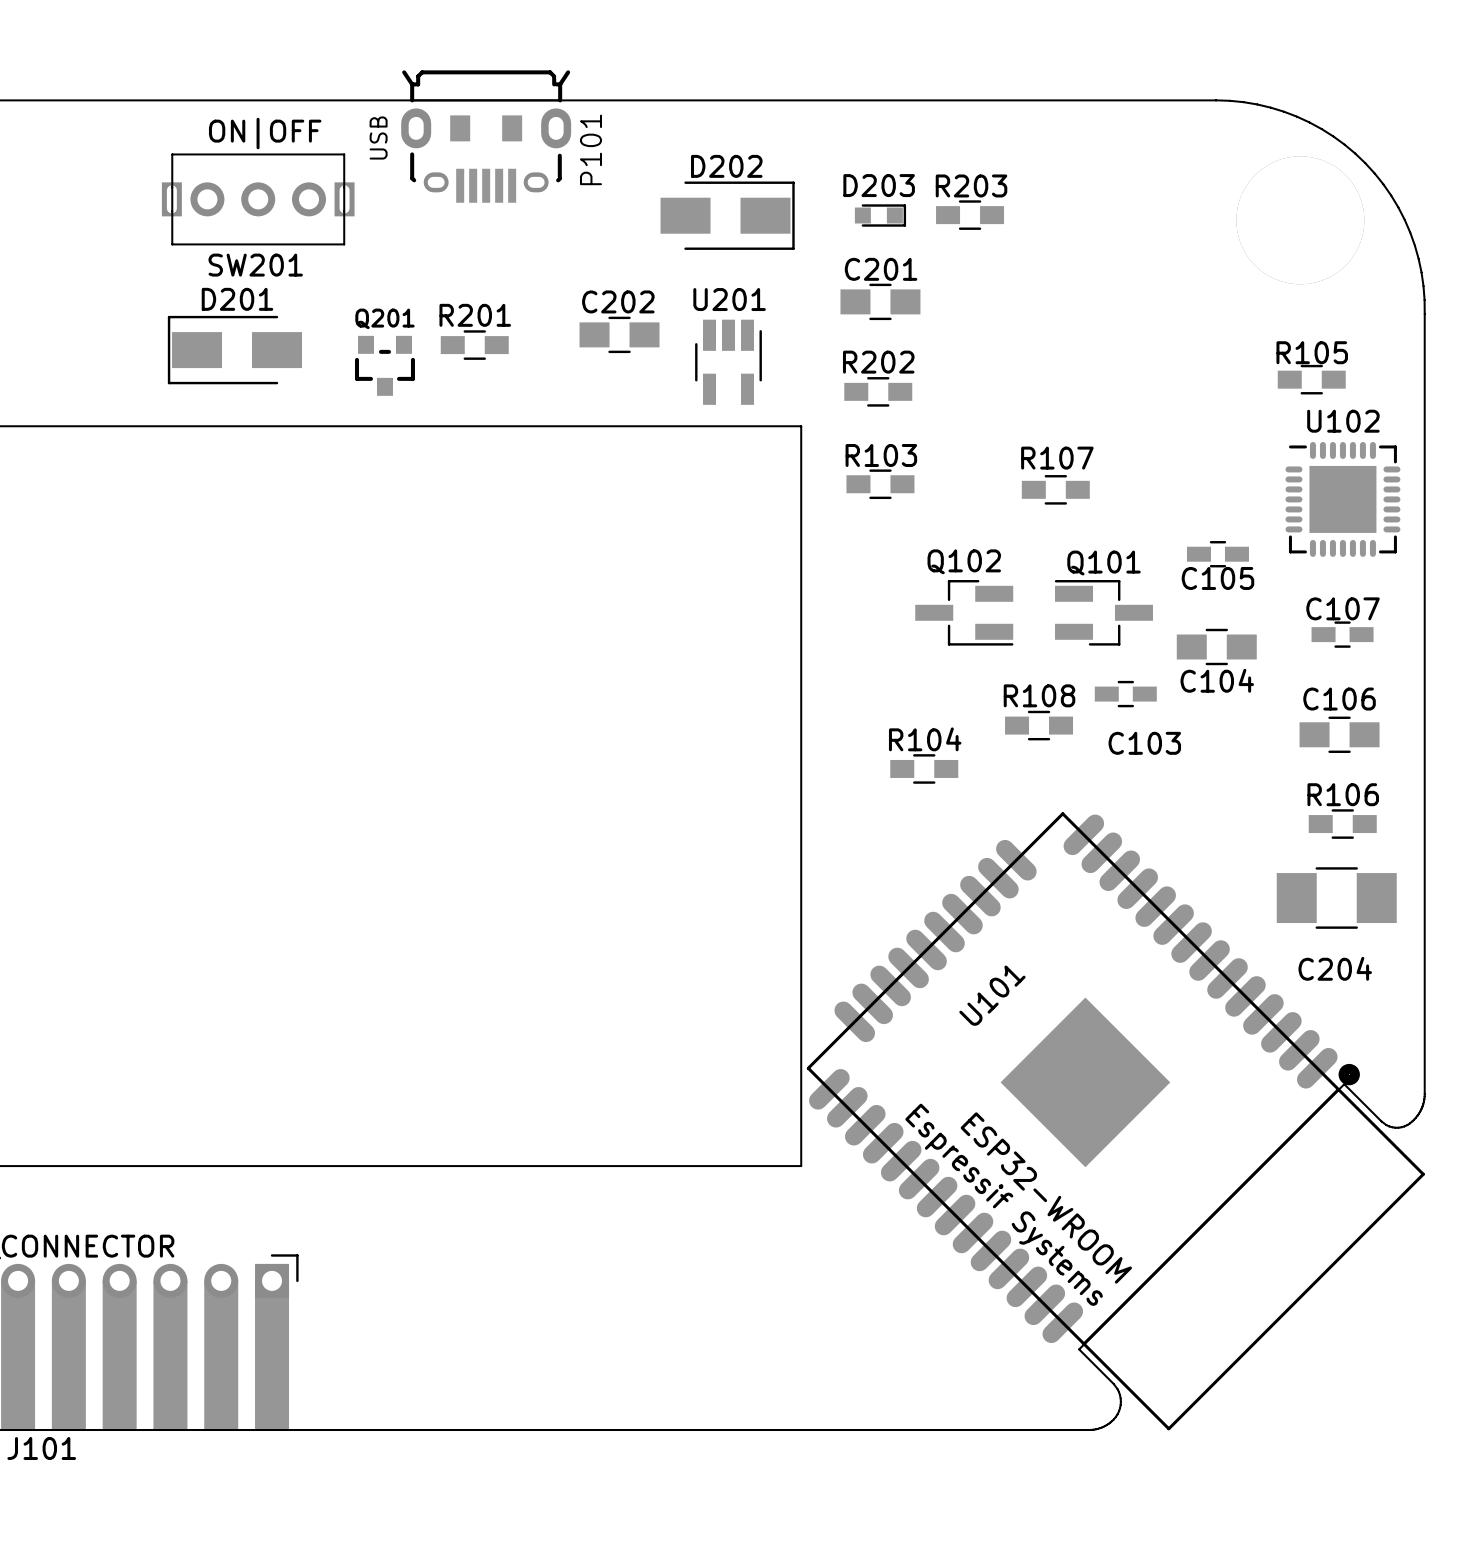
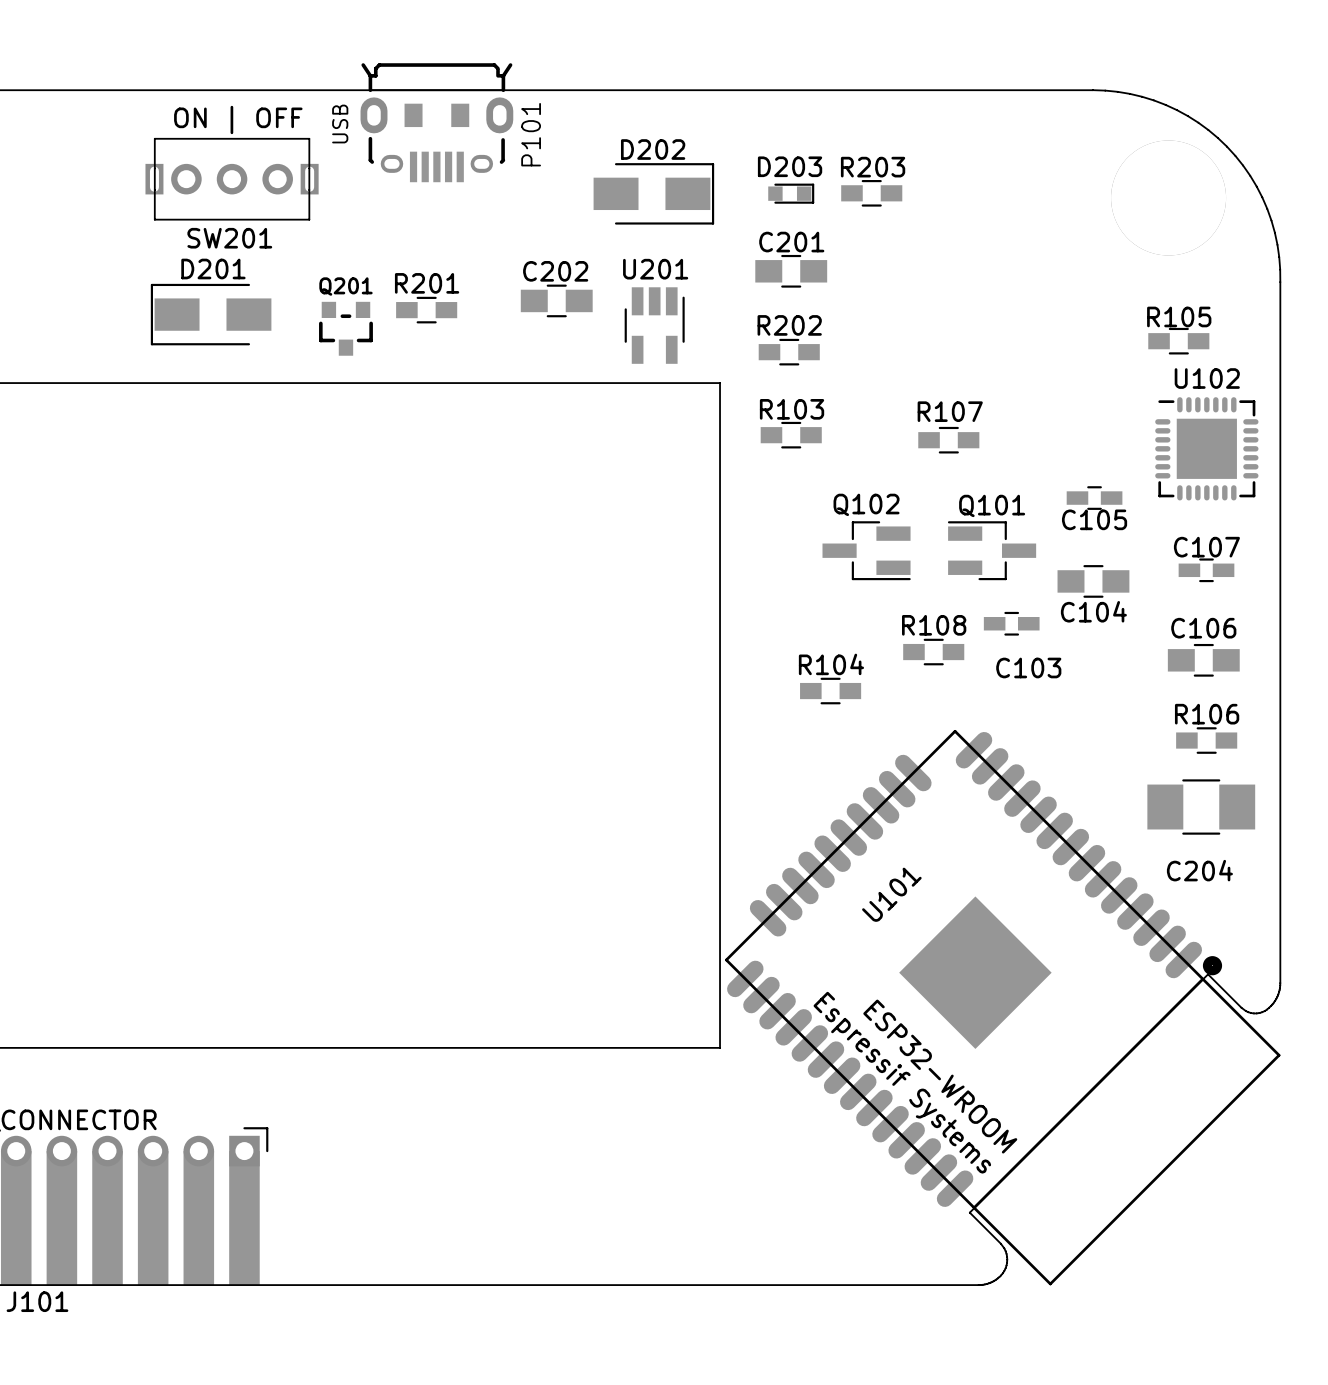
SW201 value: ON|OFF (265, 133) -> ON | OFF (238, 119)

